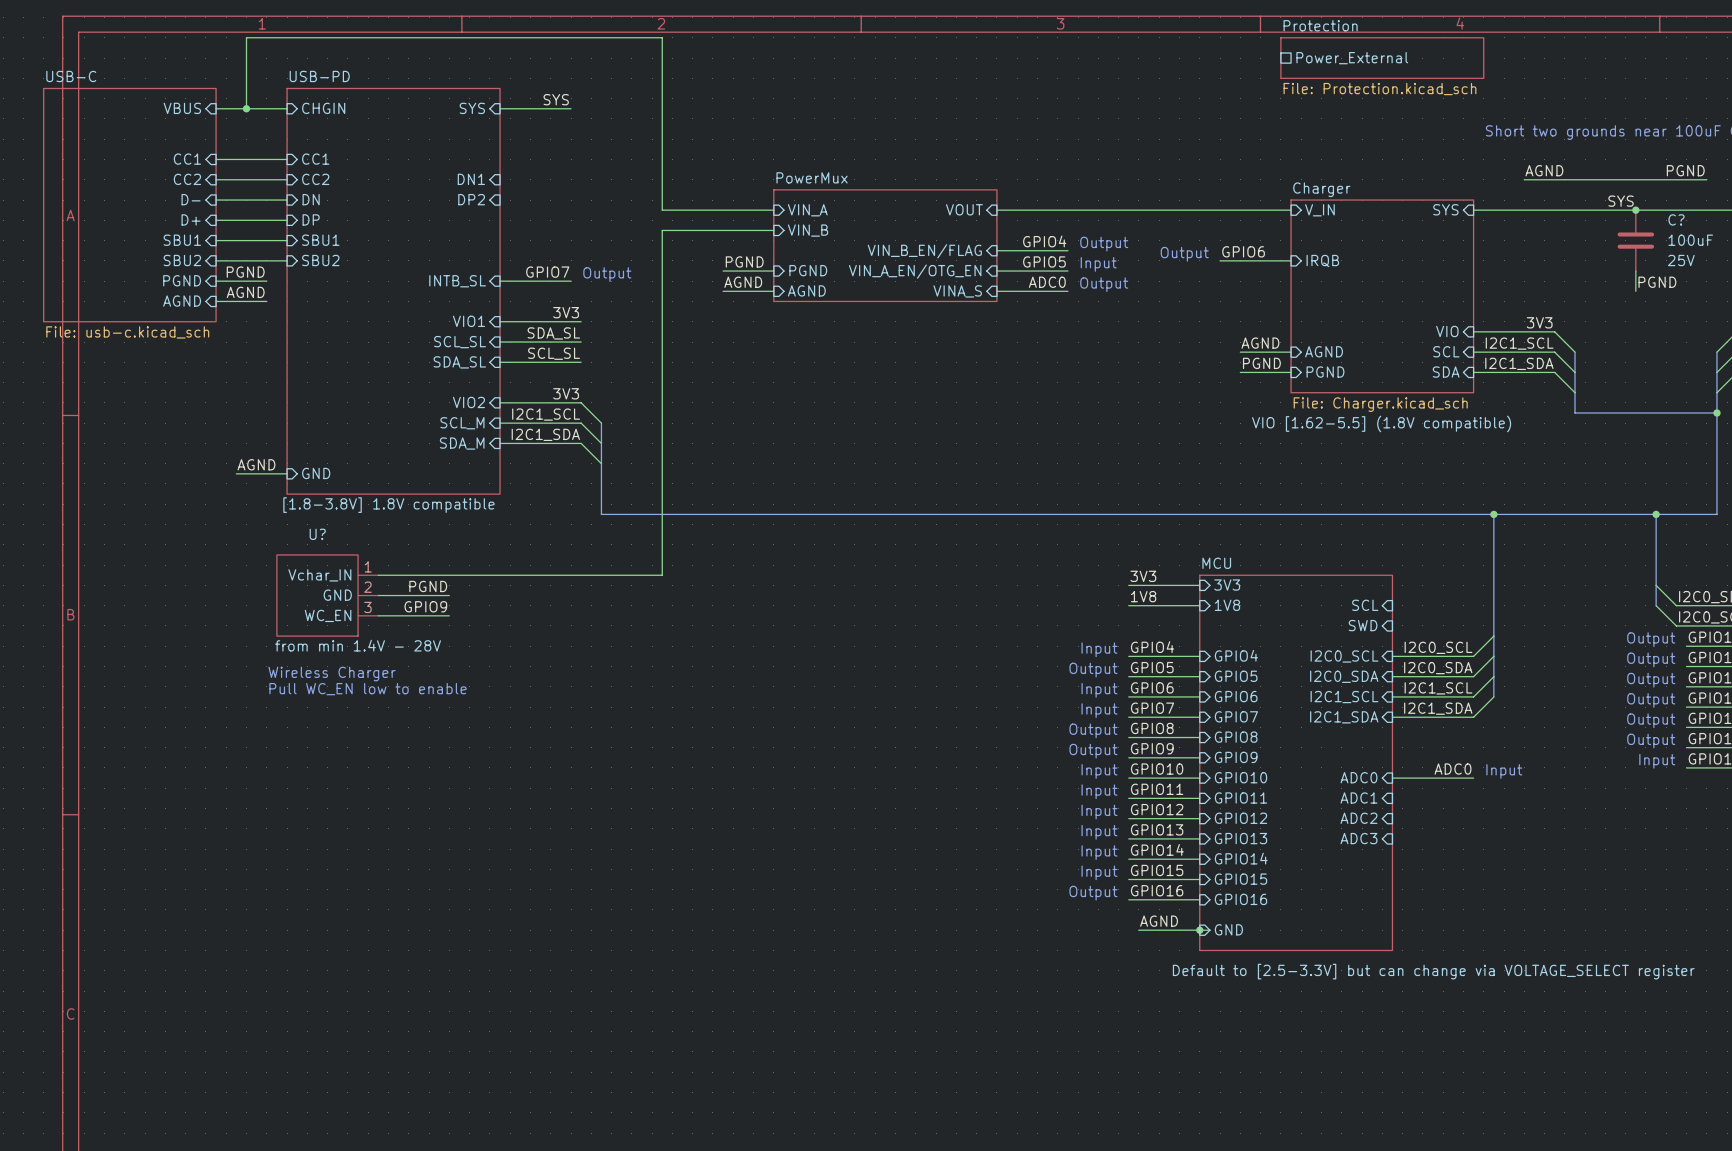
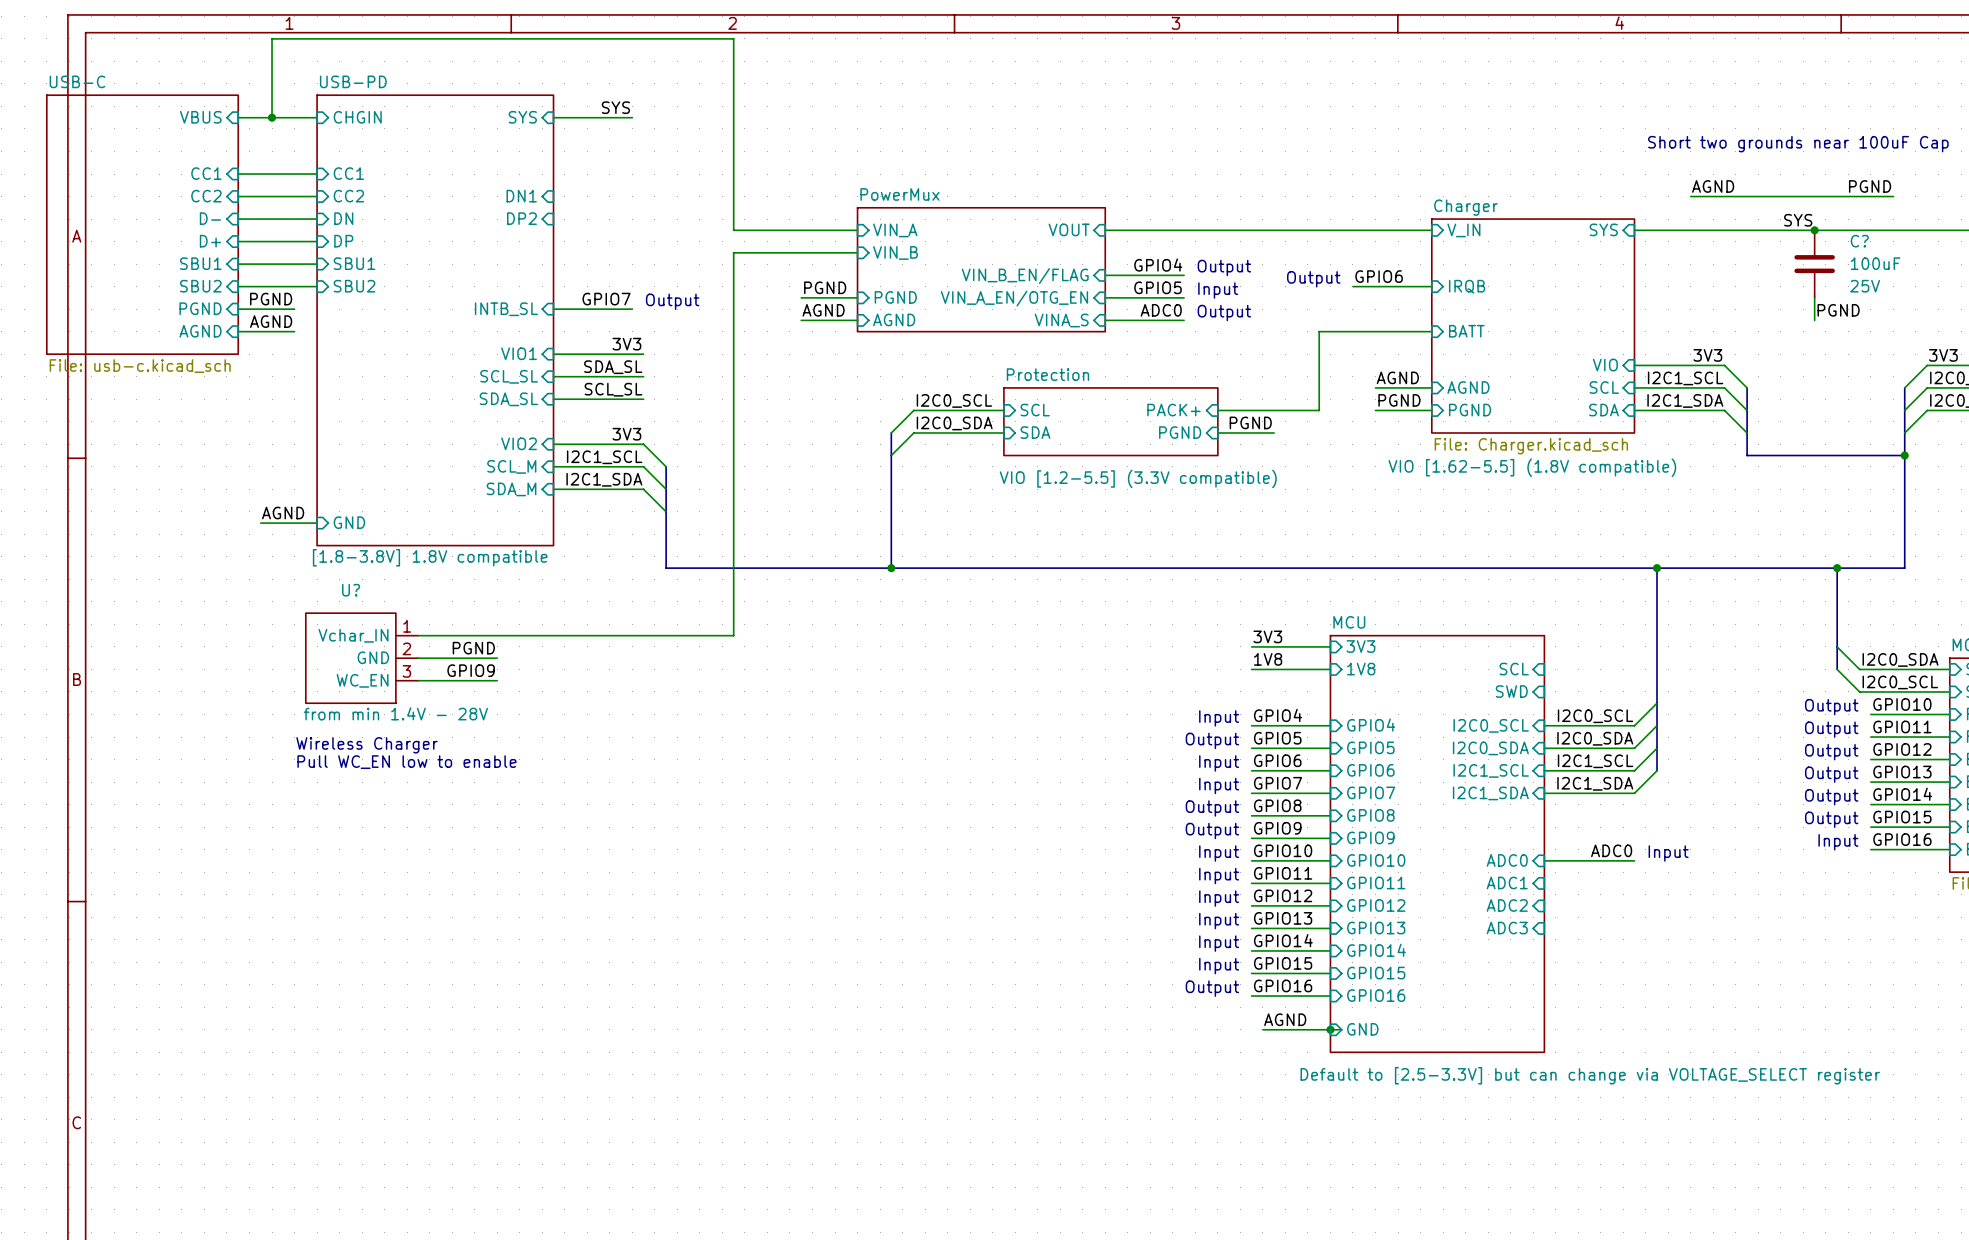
sheet pin: Power_External (1352, 58) -> none
sheet Protection: File: Protection.kicad_sch (1382, 58) -> none
wire: none -> (1431, 331) (1319, 331) (1319, 410) (1217, 410)
sheet pin: none -> BATT (1466, 331)
label: none -> I2C0_SCL (954, 400)
wire: none -> (1003, 410) (913, 410) (891, 432)
sheet pin: none -> SCL (1035, 410)
sheet pin: none -> PACK+ (1173, 410)
sheet Protection: none -> (1110, 421)
label: none -> PGND (1250, 422)
label: none -> I2C0_SDA (954, 423)
bus: none -> (891, 432) (891, 568)
wire: none -> (1003, 432) (913, 432) (891, 455)
sheet pin: none -> SDA (1035, 432)
sheet pin: none -> PGND (1180, 432)
wire: none -> (1217, 432) (1274, 432)
junction: none -> (891, 568)

